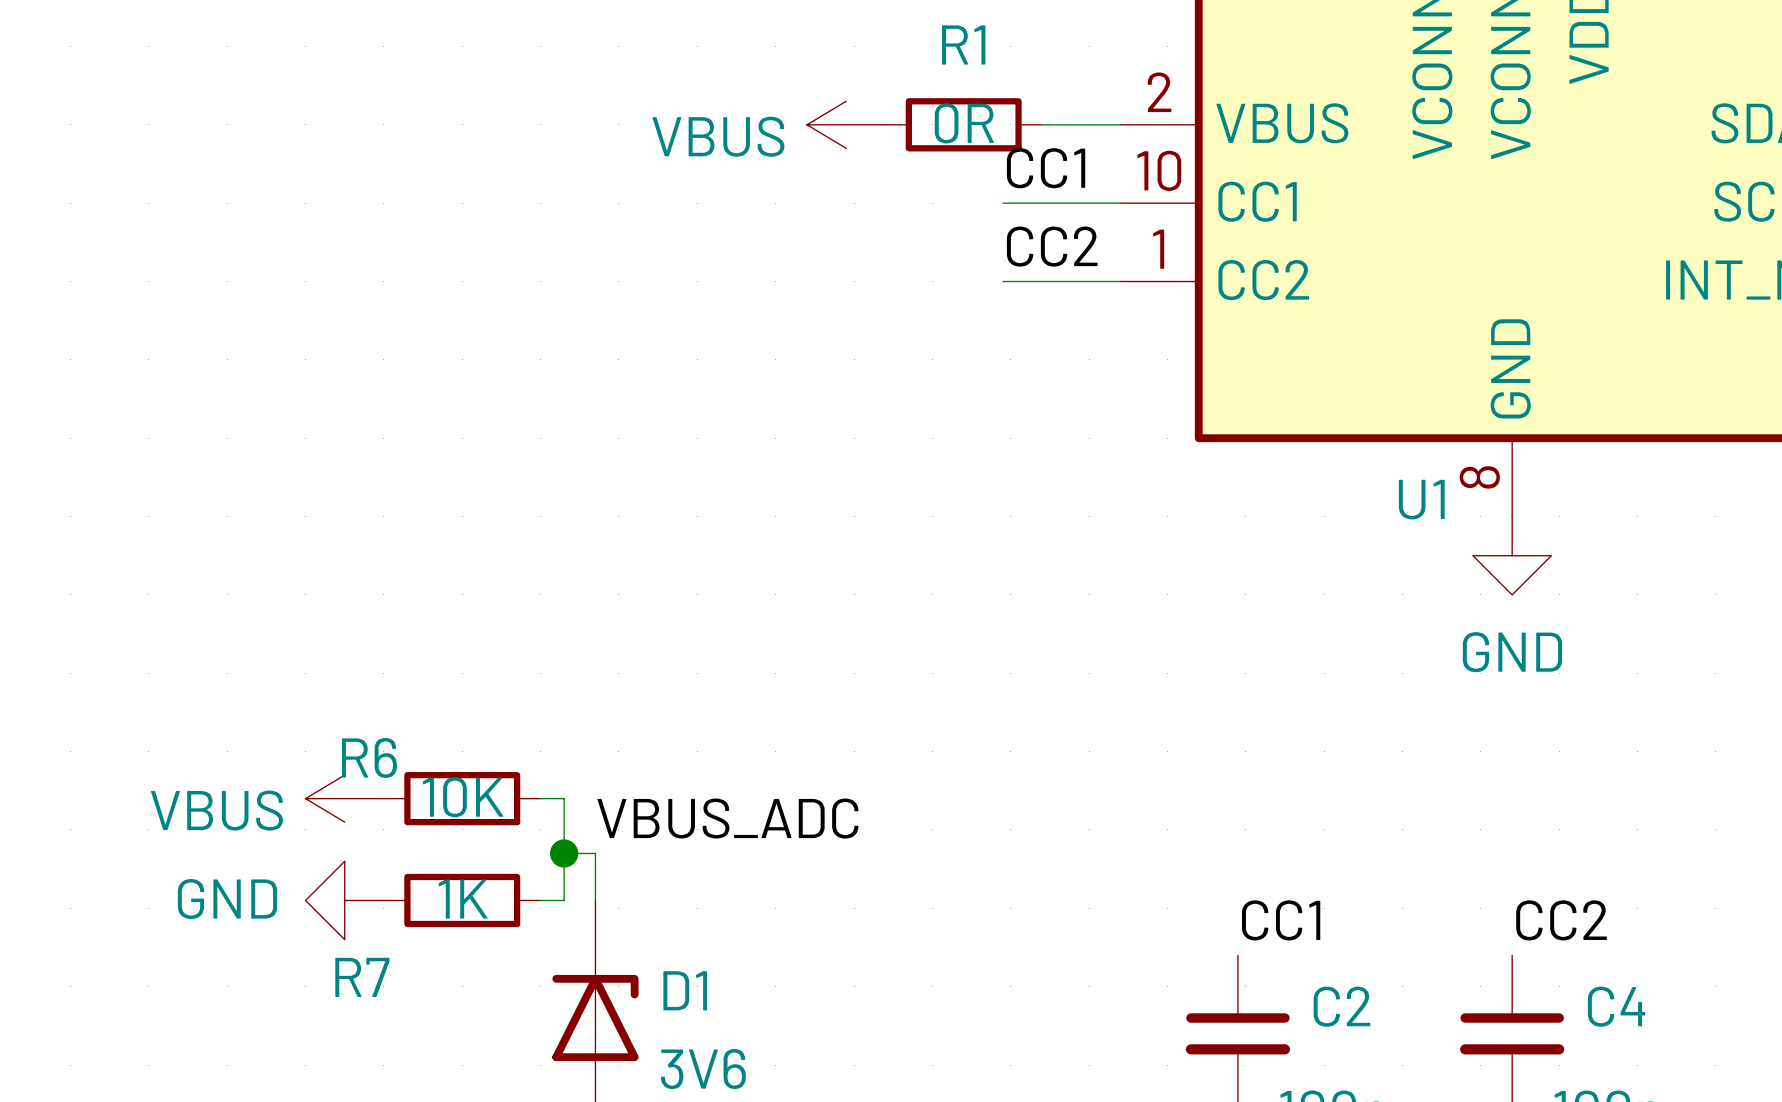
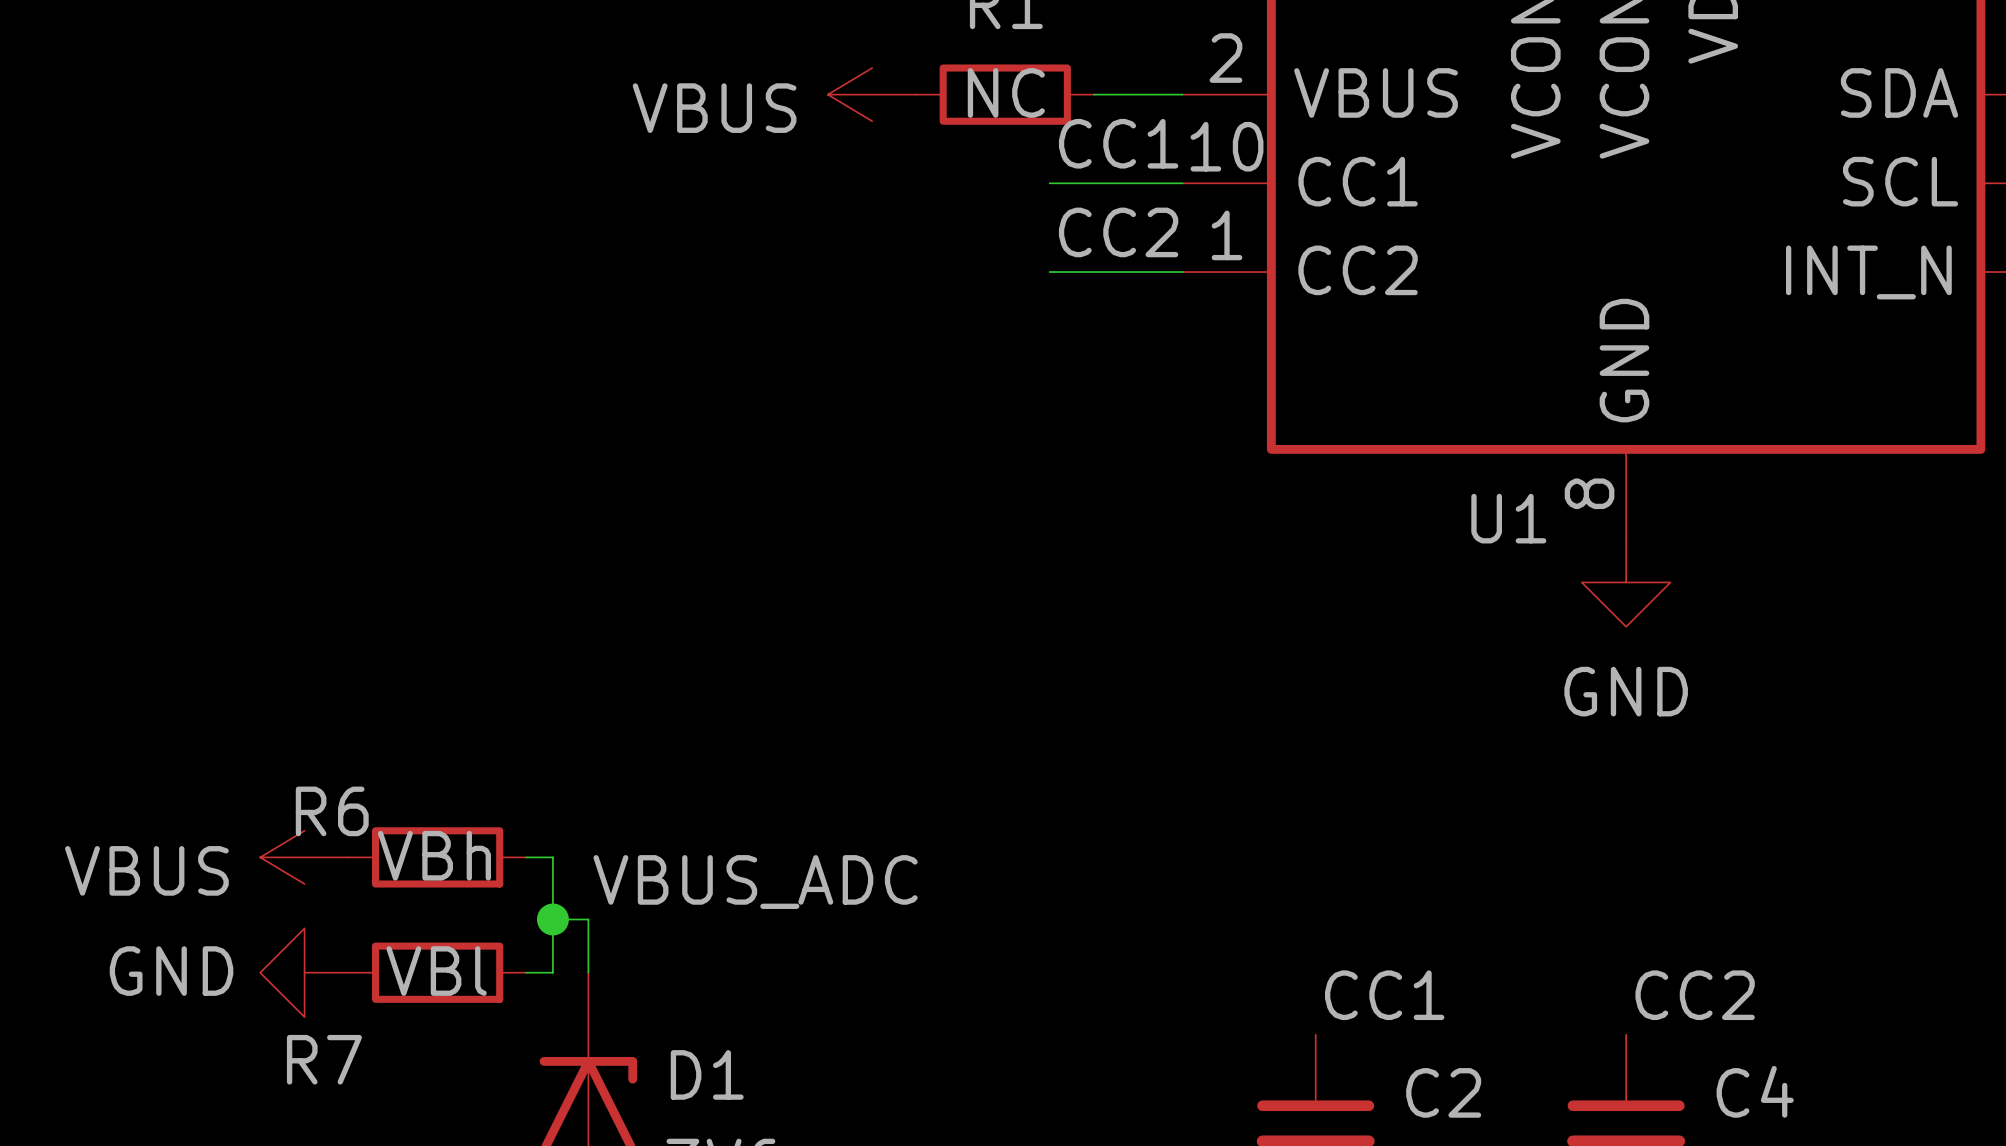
R1 value: 0R (964, 123) -> NC (1006, 92)
R6 value: 10K (463, 797) -> VBh (434, 855)
R7 value: 1K (463, 899) -> VBl (436, 971)

